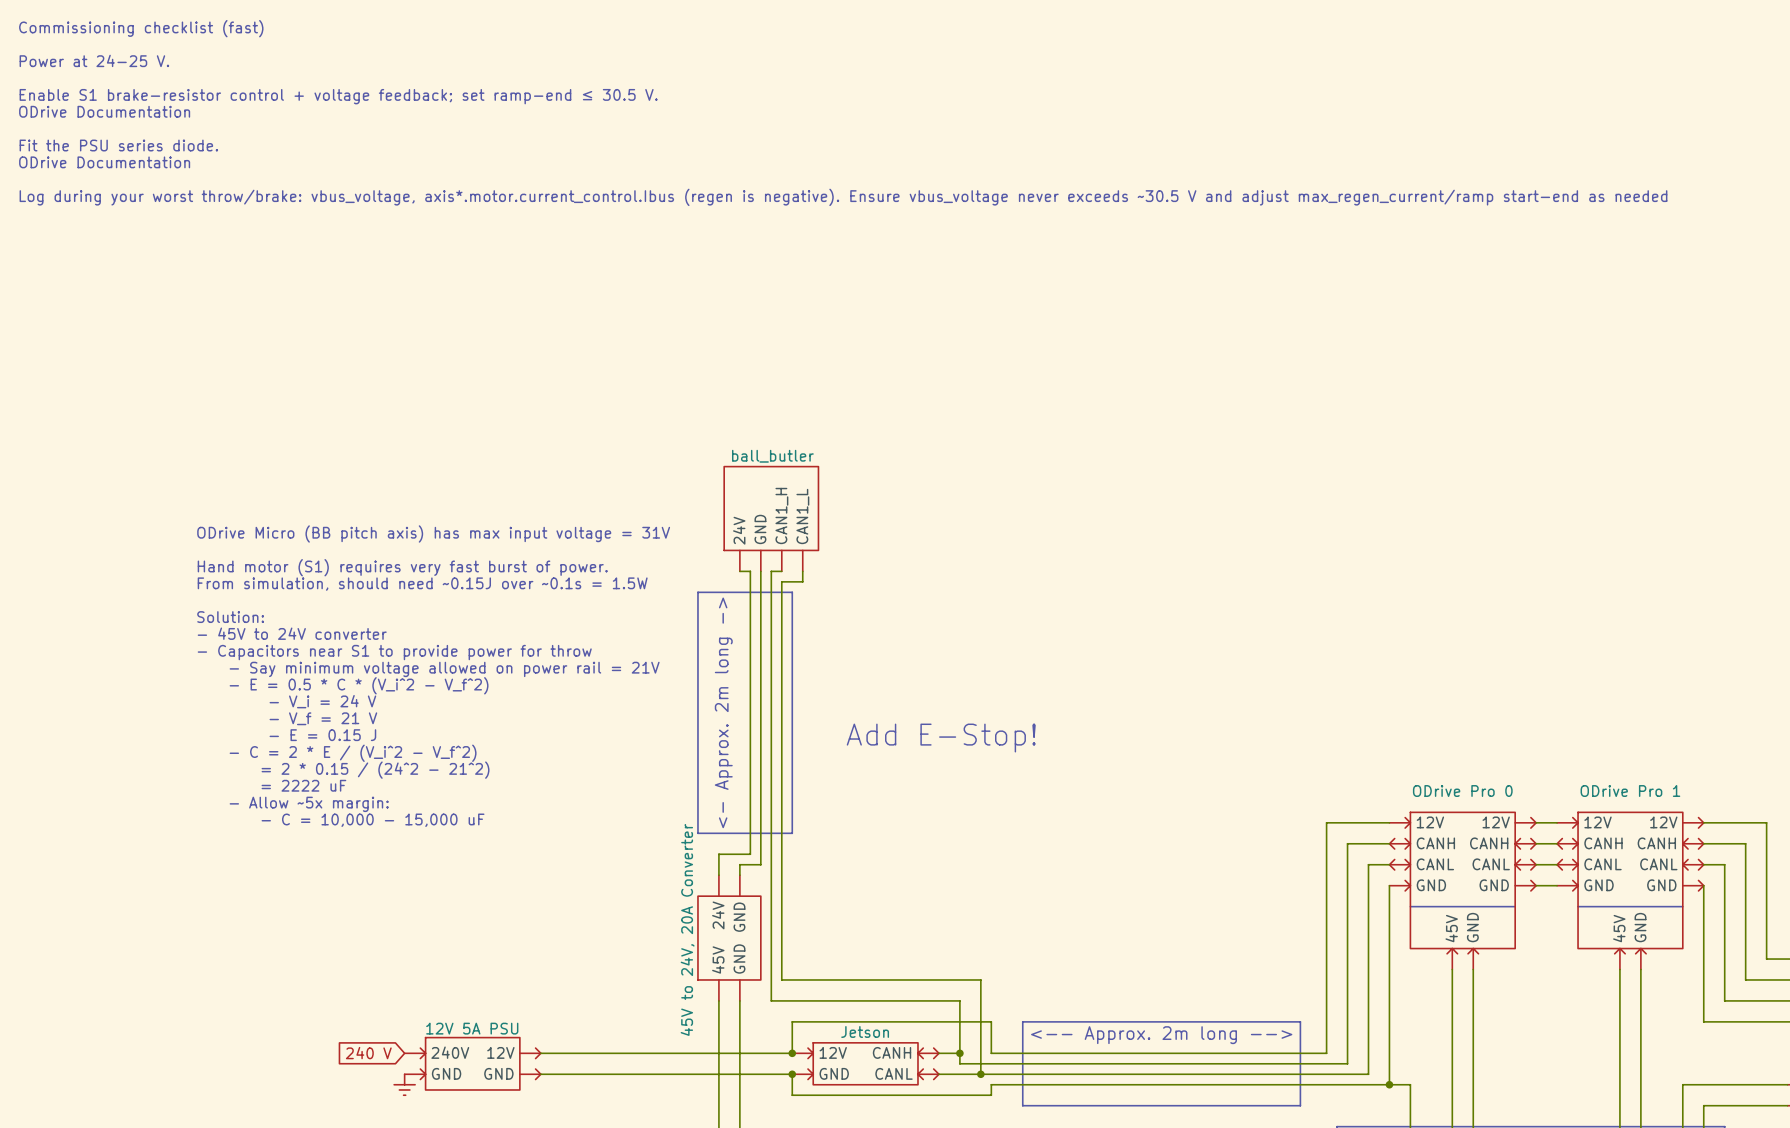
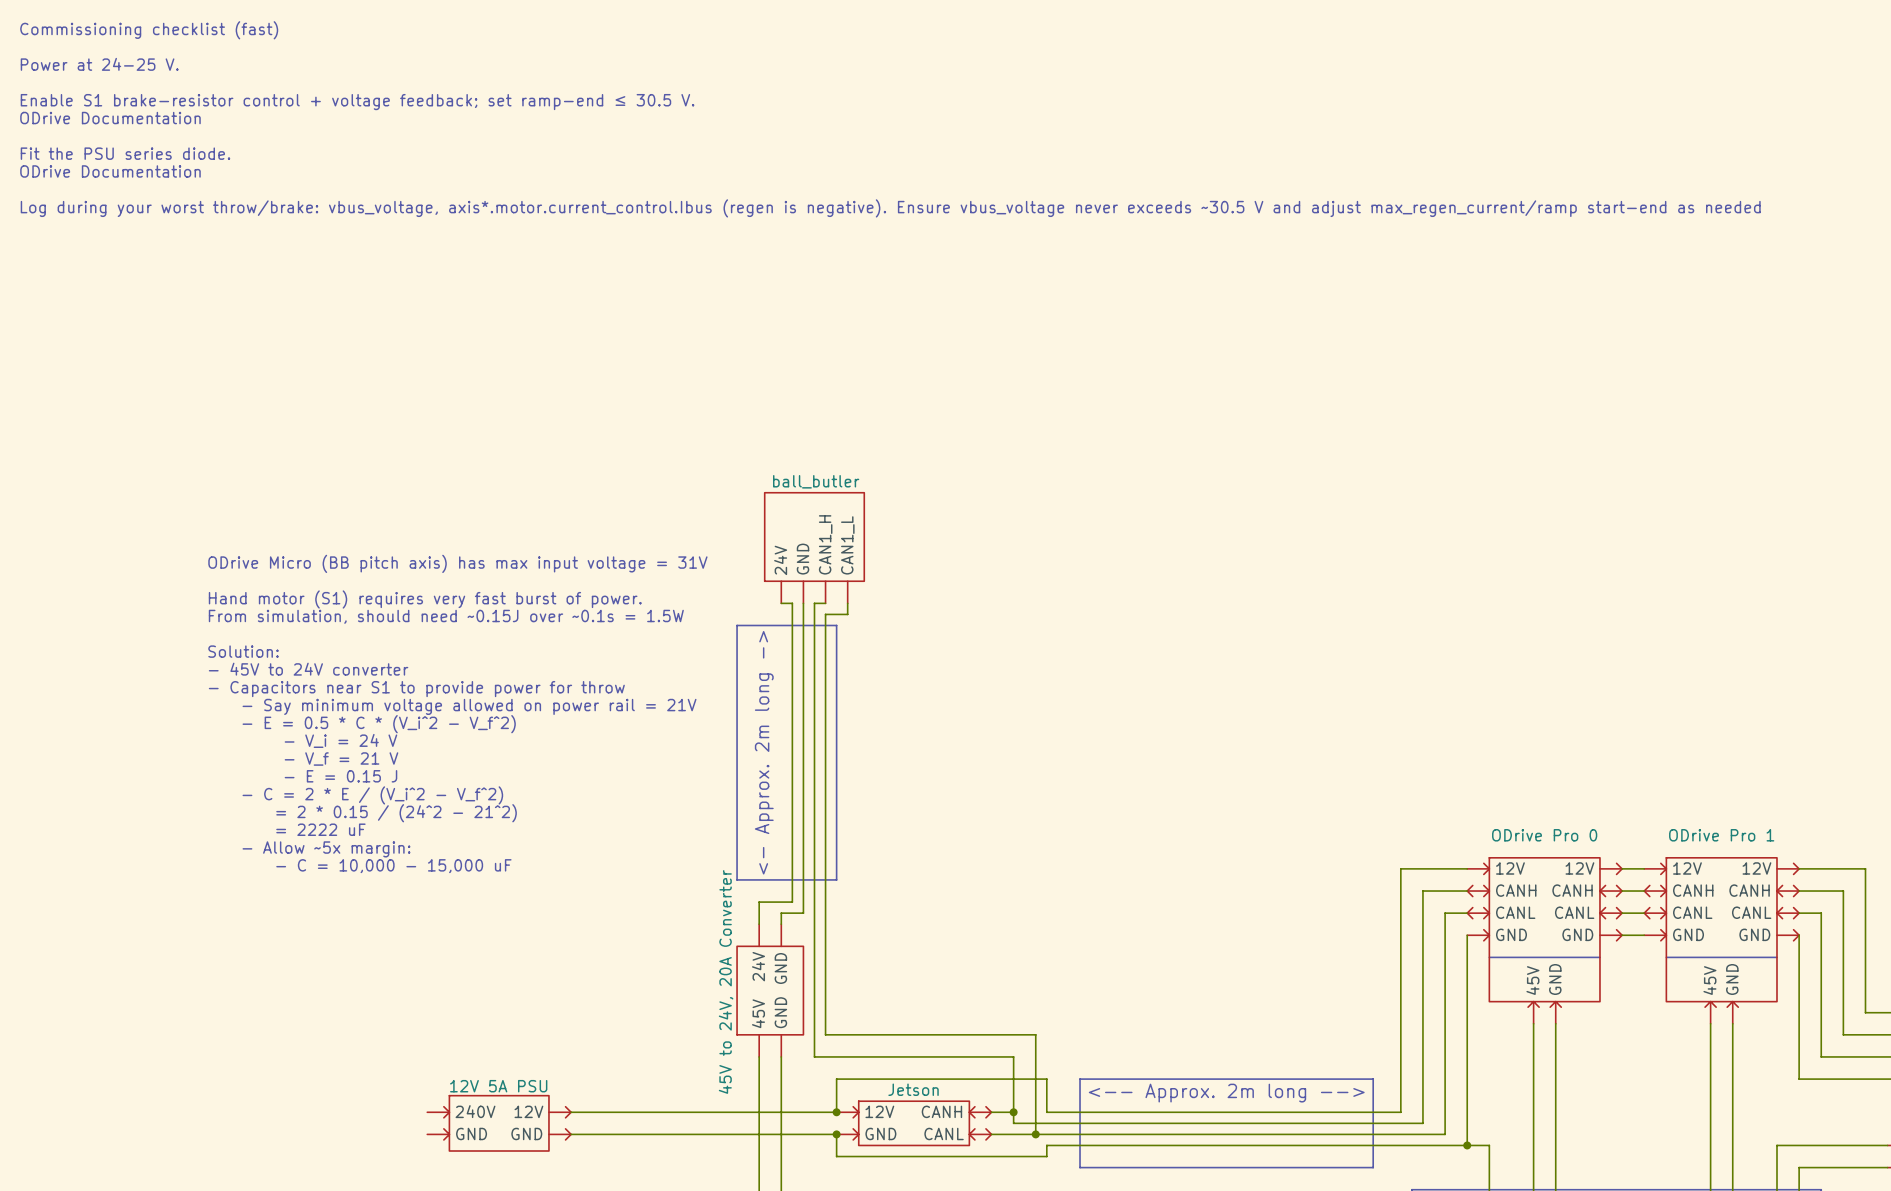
text: Add E-Stop! (941, 738) -> none
global label: 240 V (368, 1053) -> none
power symbol: (404, 1084) -> none

